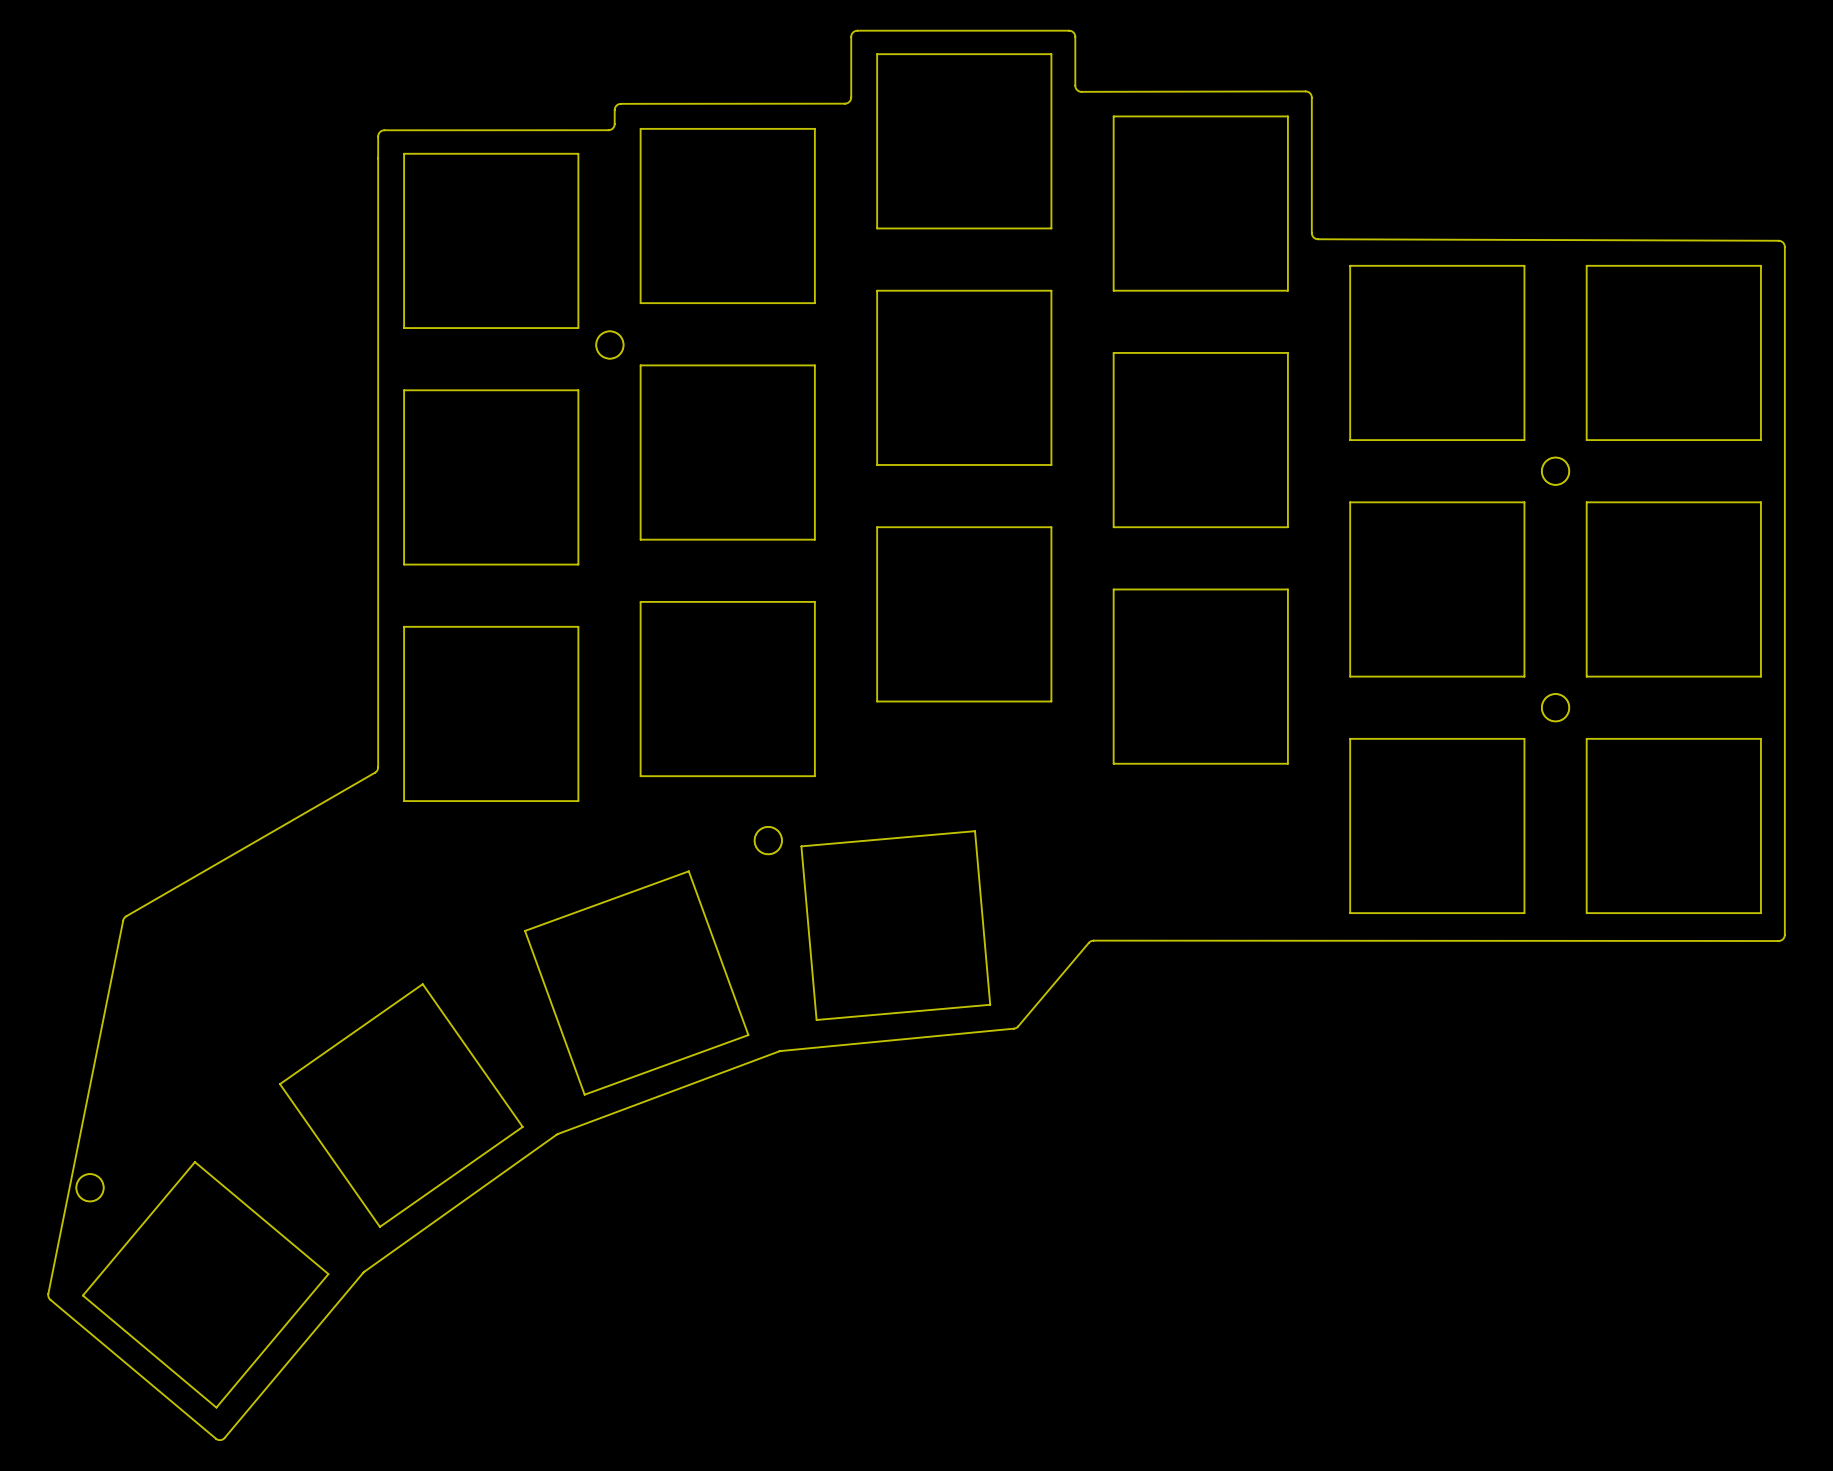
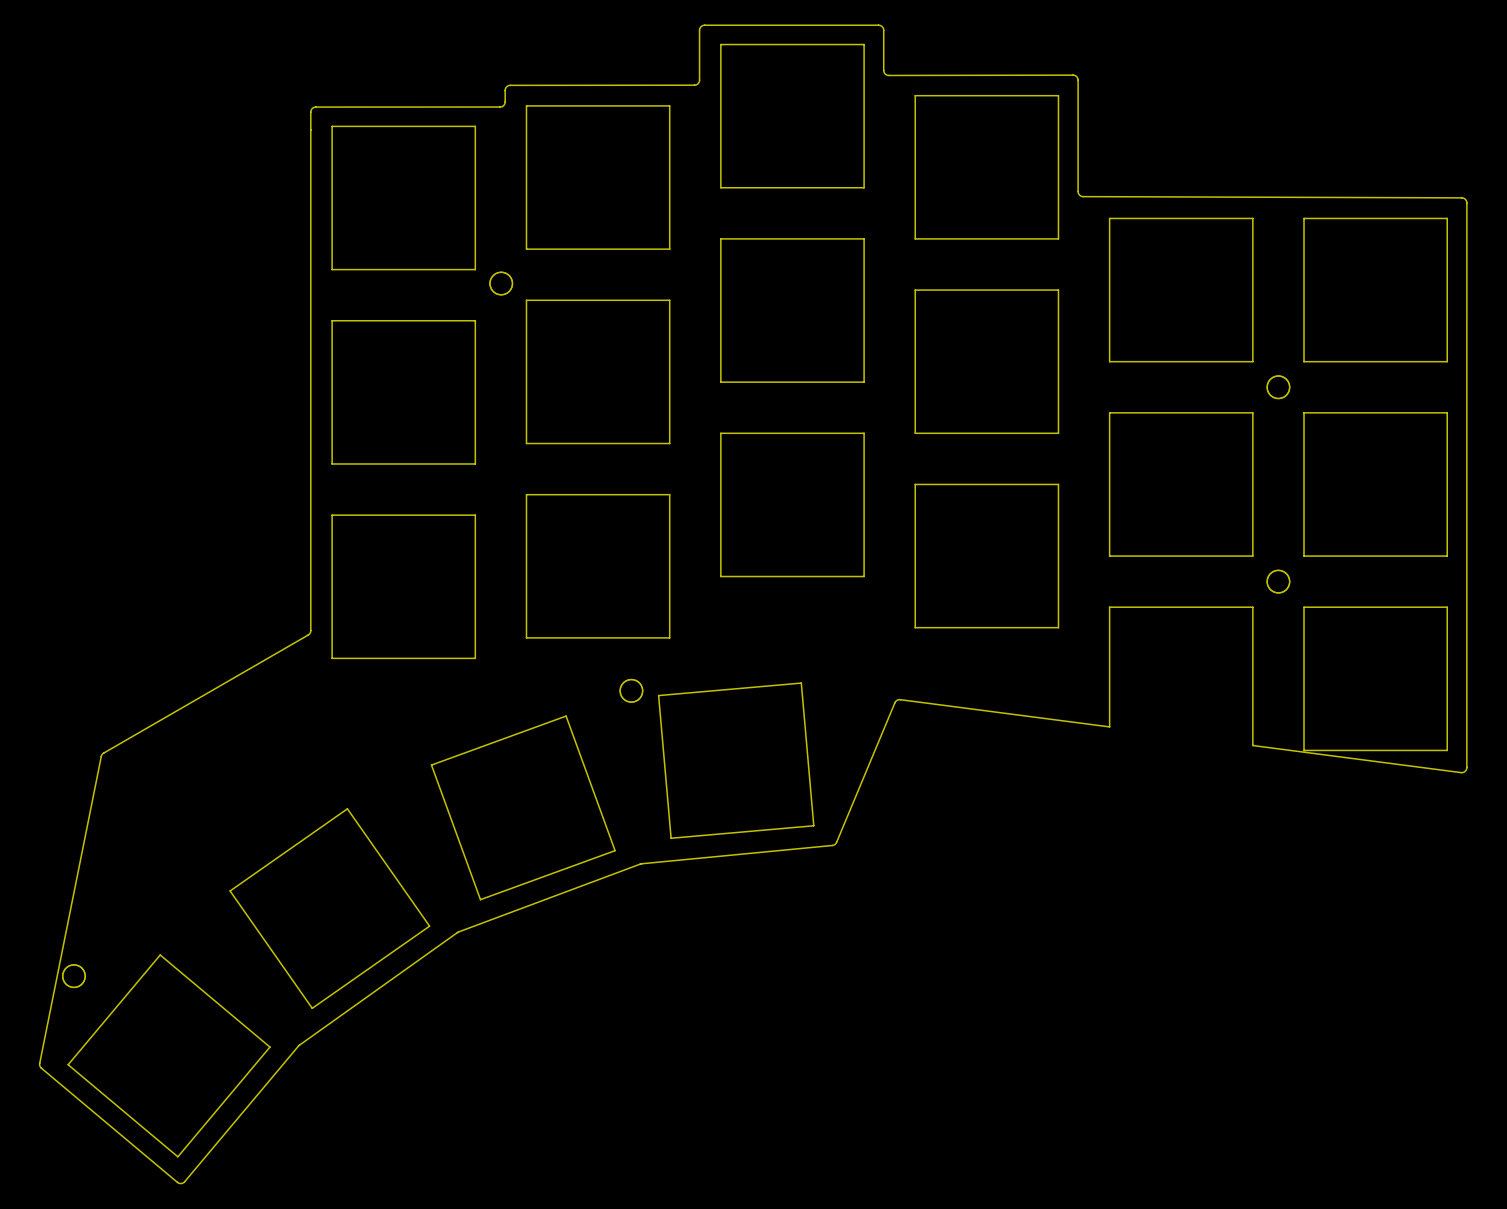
board edge: (1350, 884) (1350, 913) (1524, 913) (1524, 907) -> (1466, 767) (1465, 771) (1461, 772) (1252, 745)
board edge: (1784, 933) (1783, 938) (1778, 941) (1092, 940) (1088, 942) (1018, 1026) (1012, 1028) -> (1109, 726) (897, 700) (836, 842) (832, 845)

